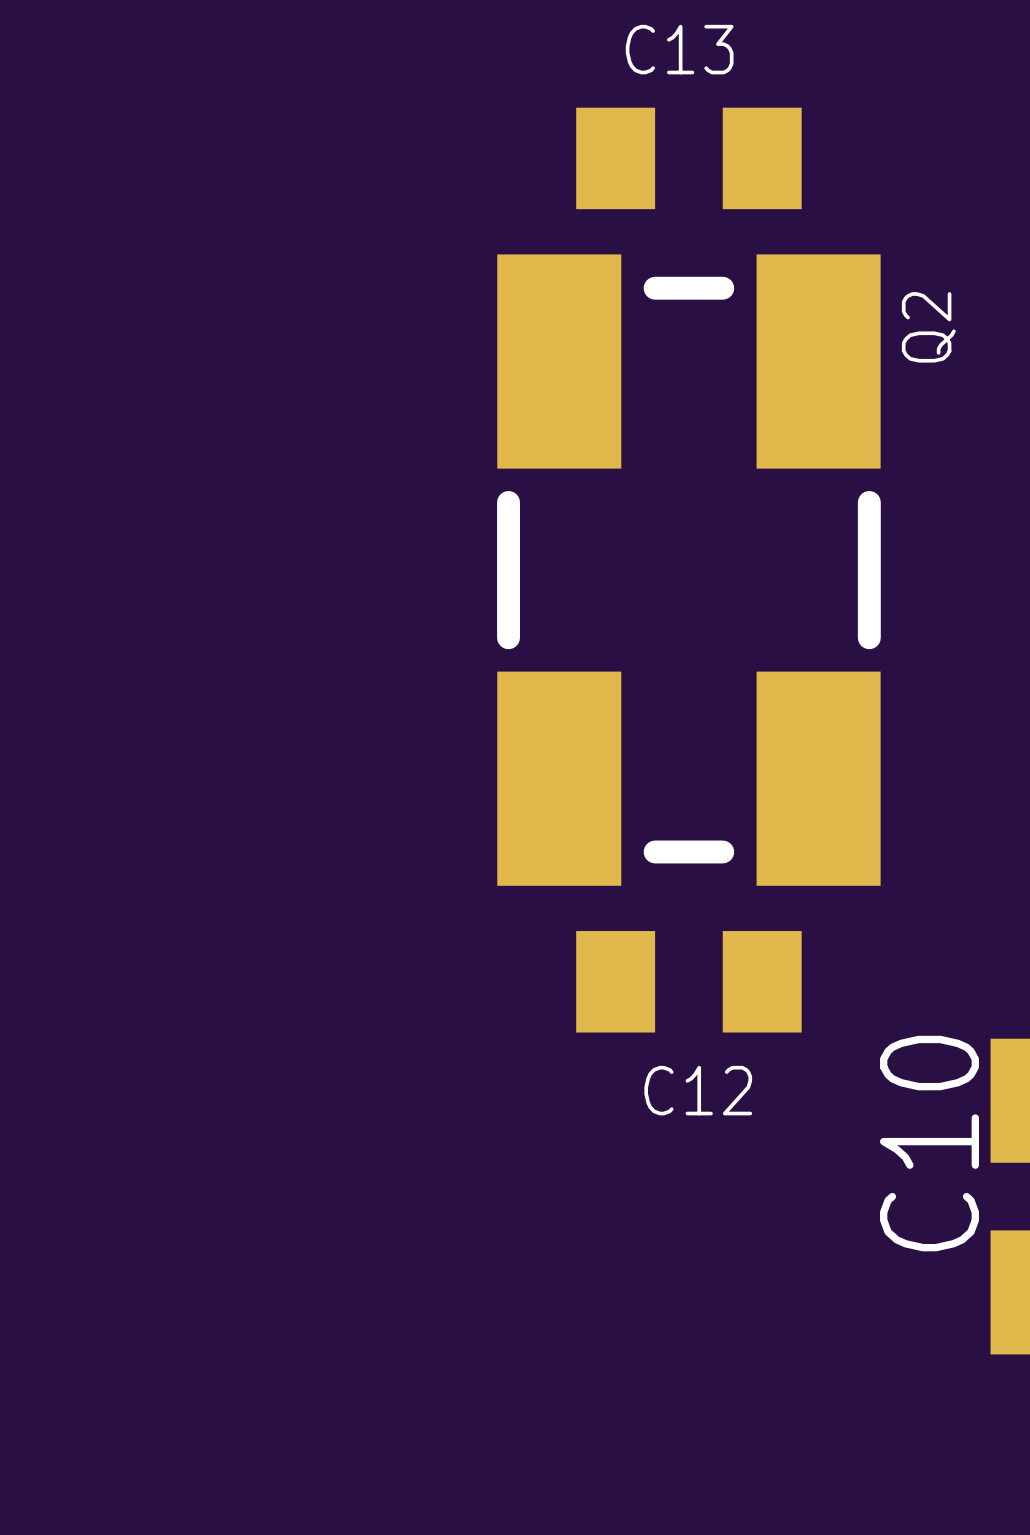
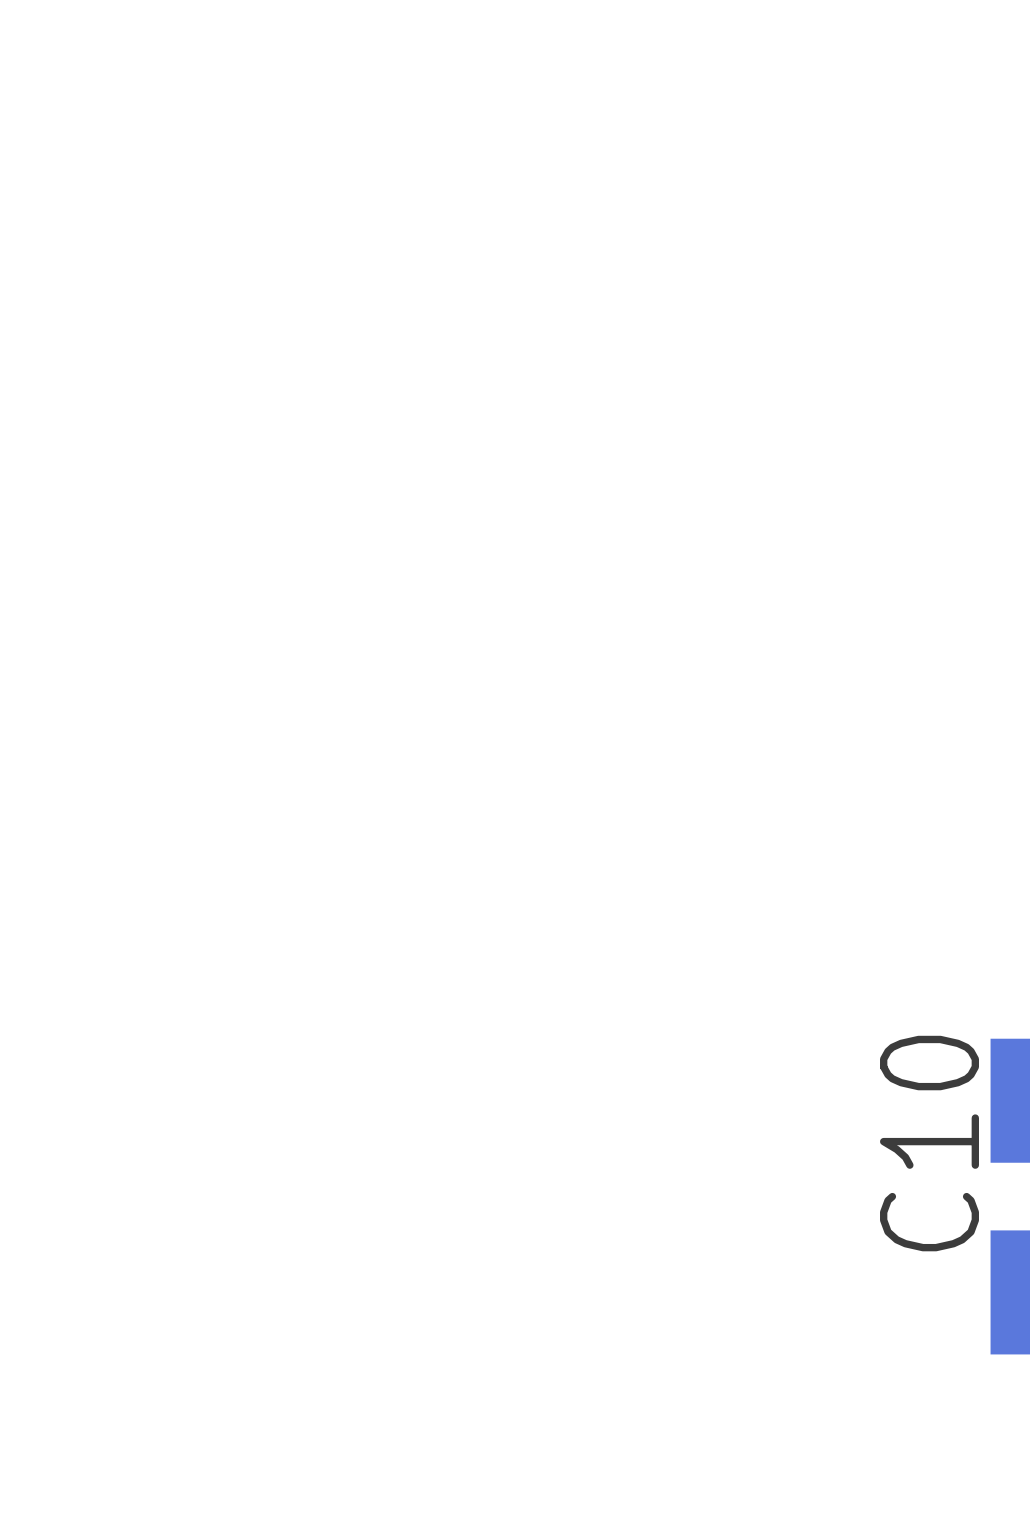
C13: (688, 158) -> none
Q2: (688, 570) -> none
C12: (688, 981) -> none

